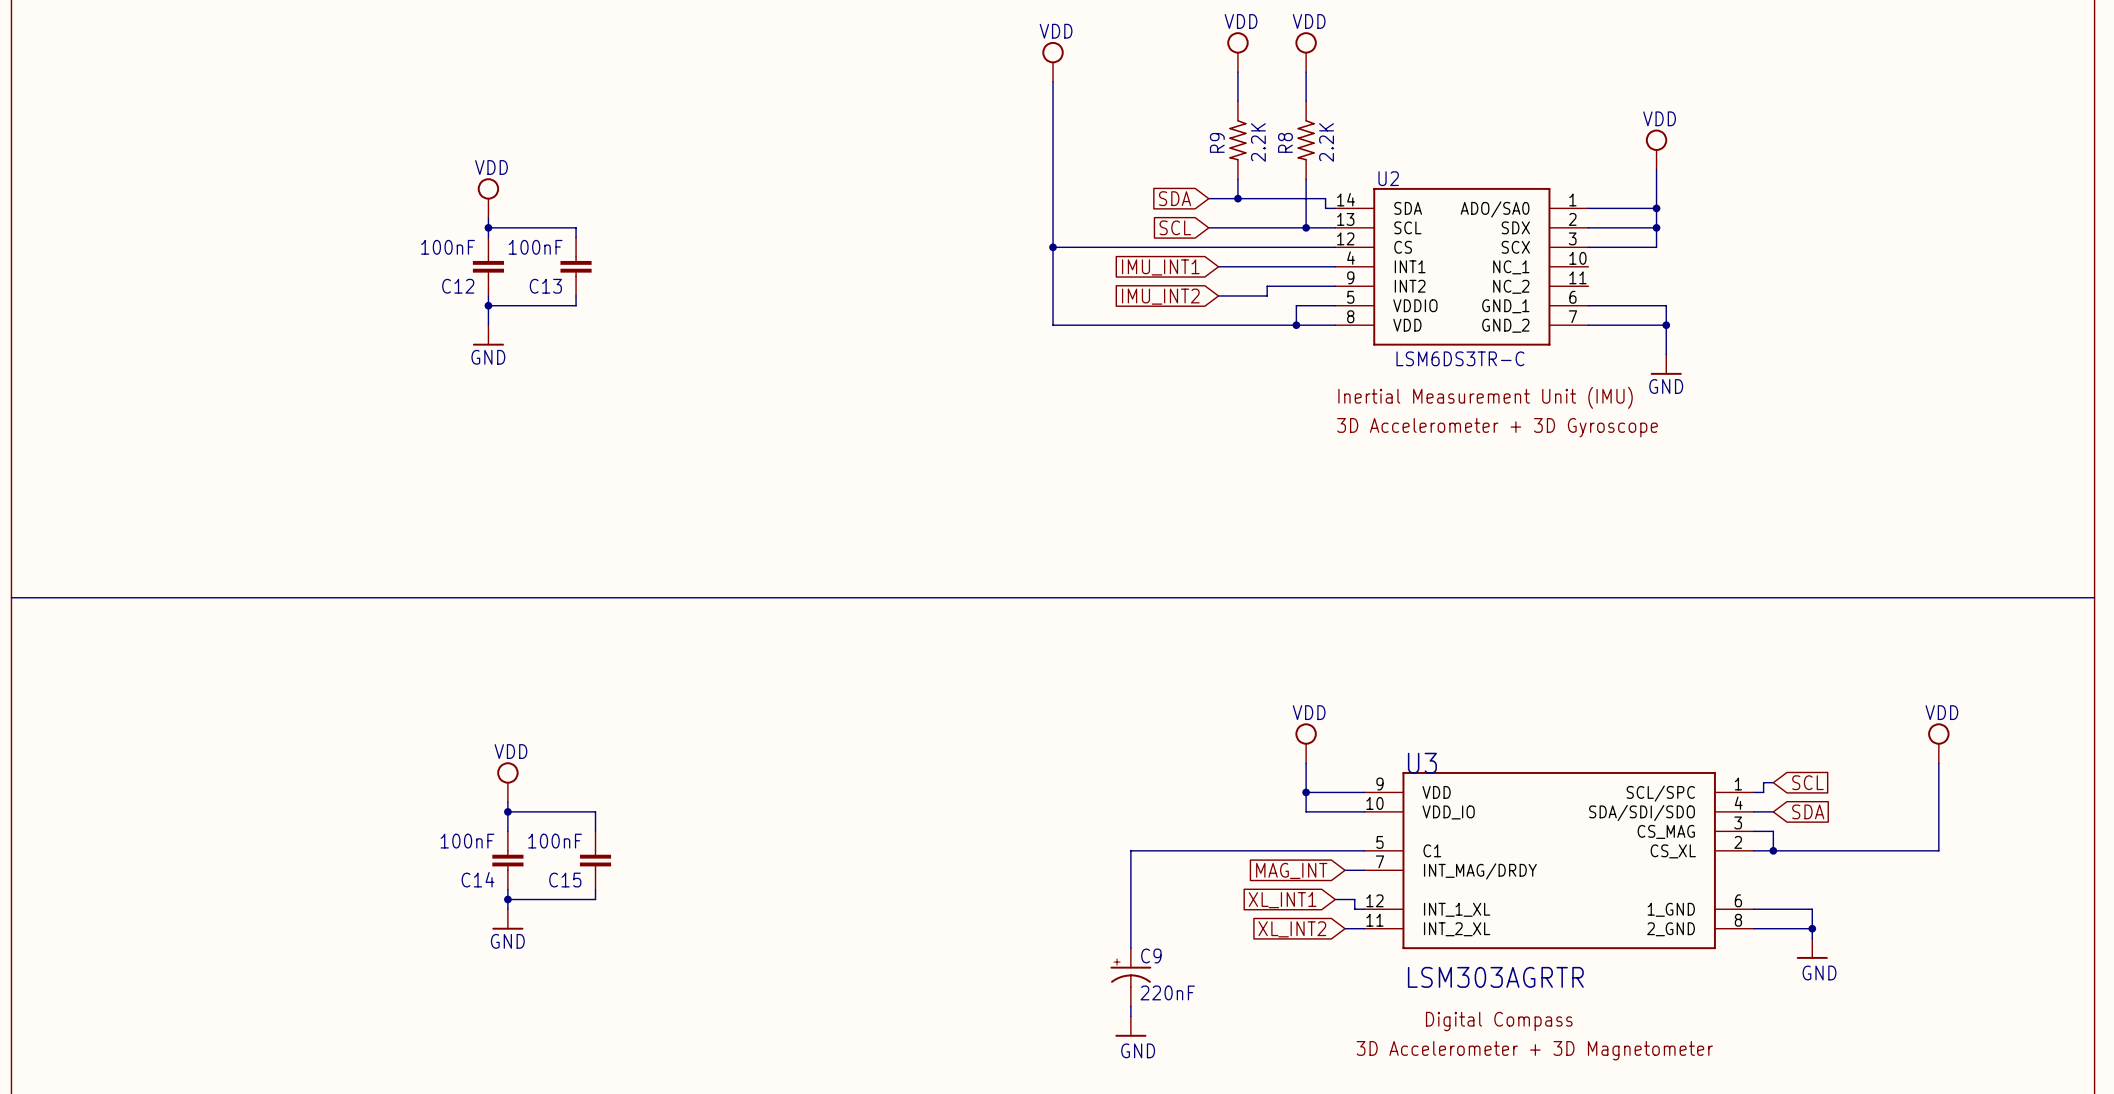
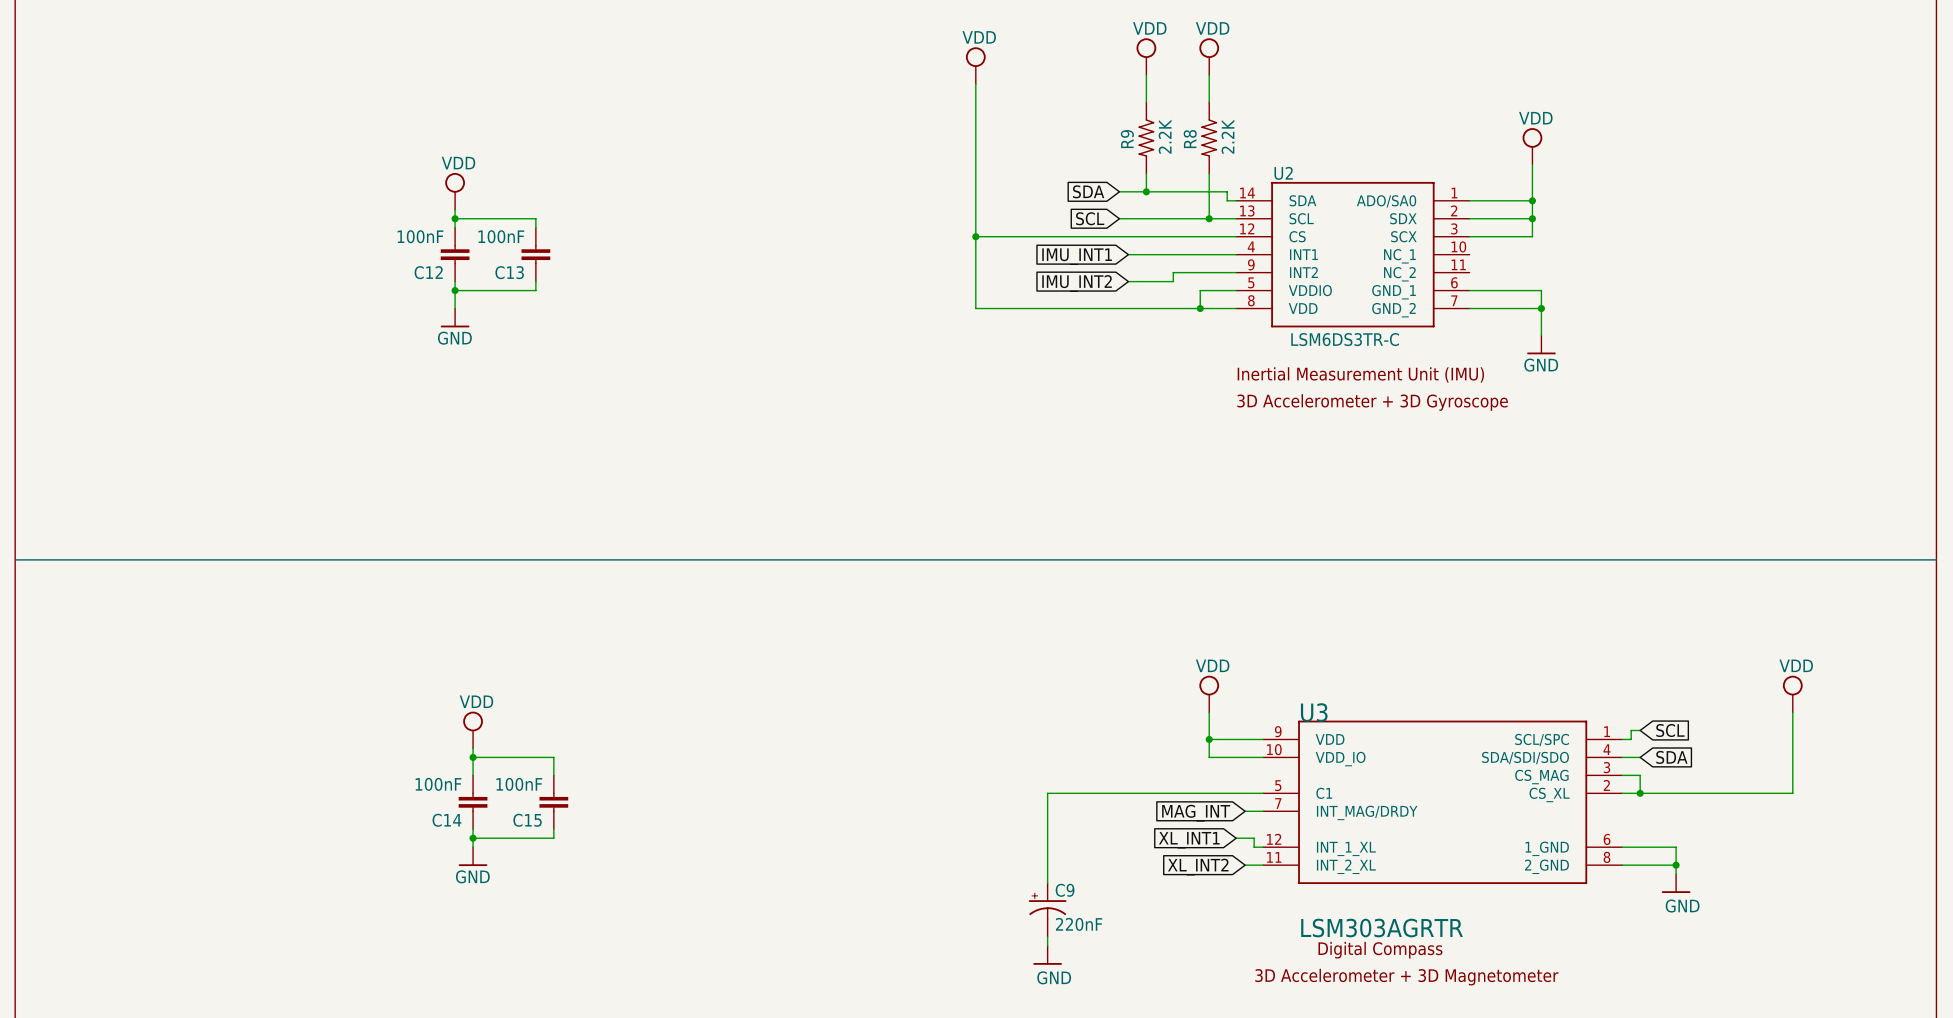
U3 symbol: [1364, 771, 1754, 950] -> [1263, 720, 1623, 885]

